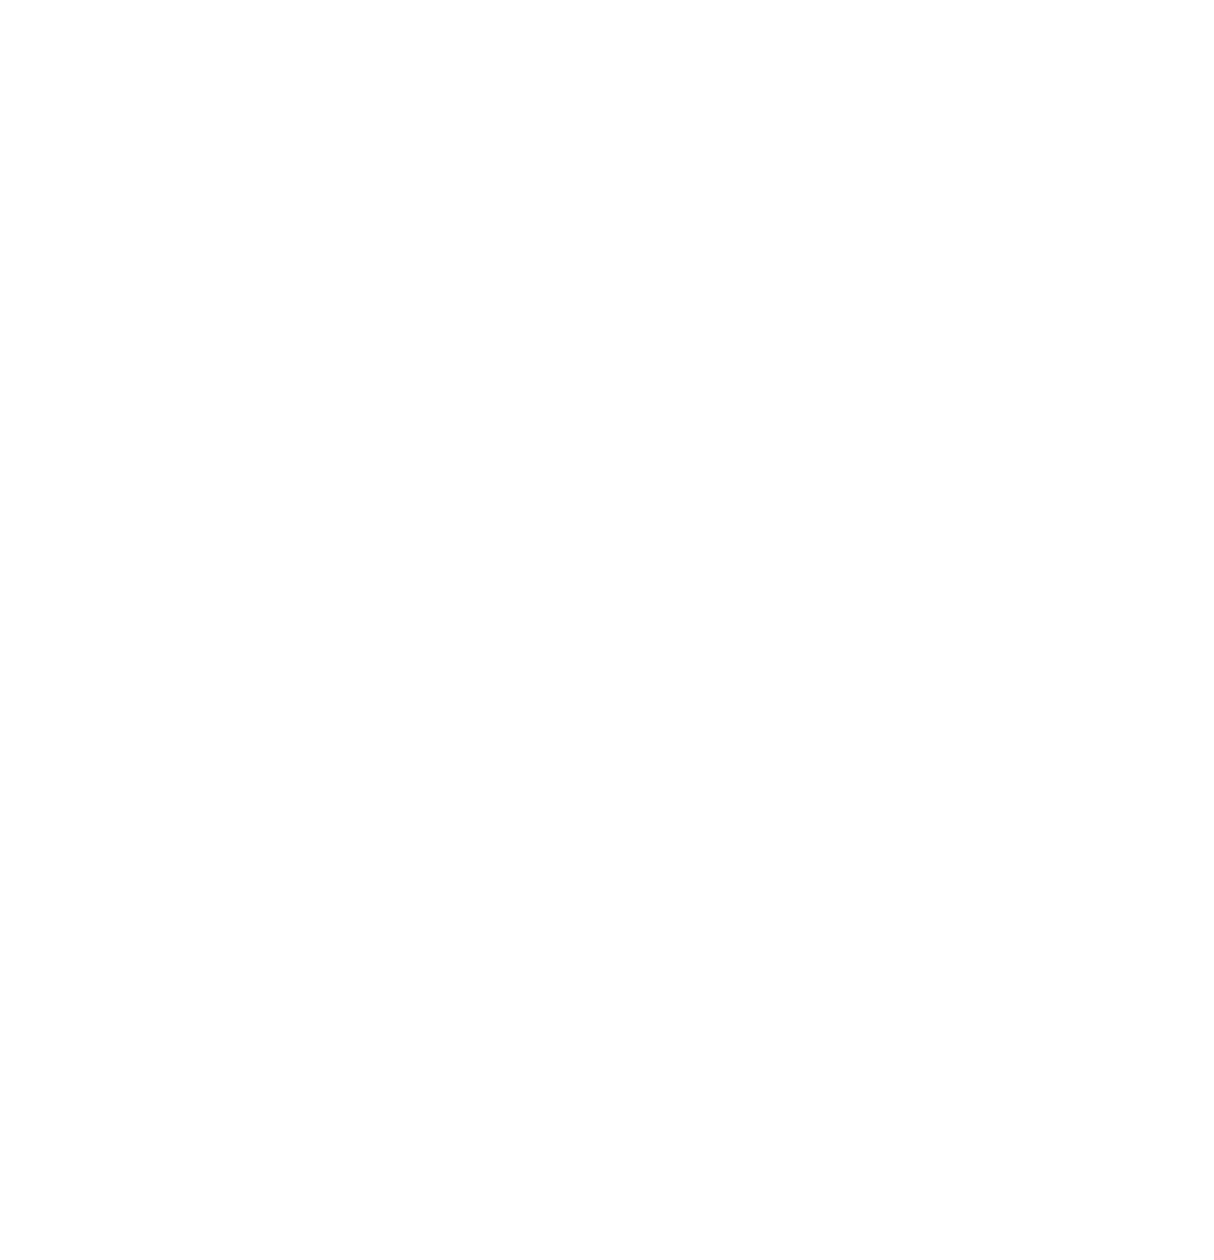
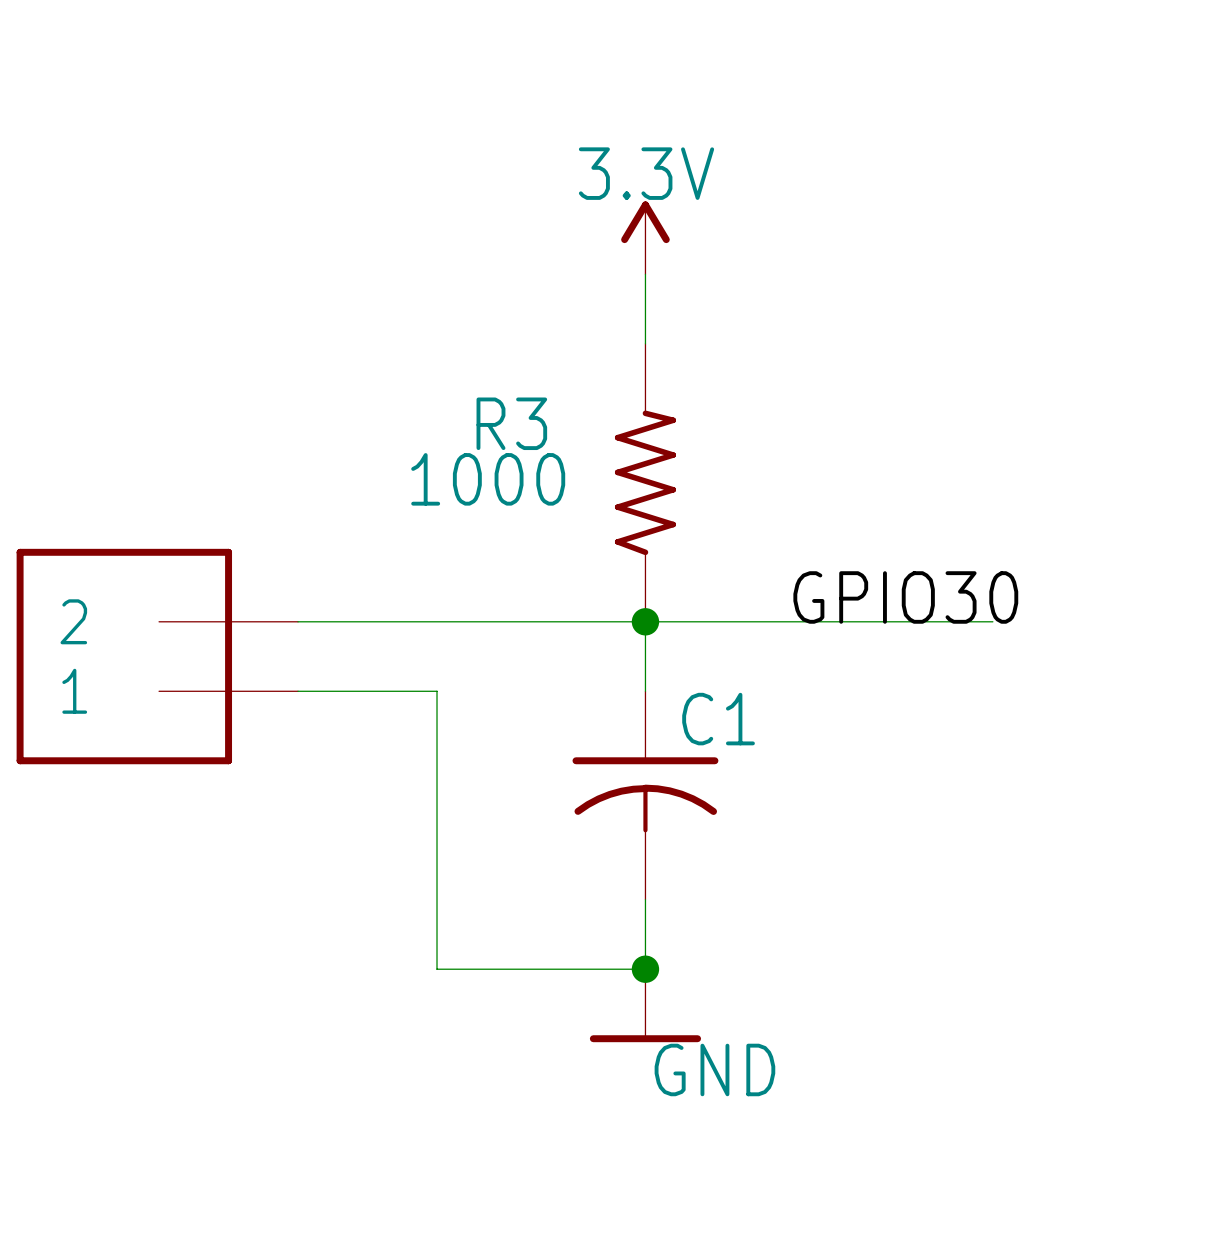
power symbol: none -> 3.3V (645, 237)
wire: none -> (645, 274) (645, 343)
R3: none -> 1000 (645, 482)
label: none -> GPIO30 (905, 597)
wire: none -> (298, 621) (992, 621)
wire: none -> (645, 621) (645, 691)
junction: none -> (645, 621)
part: none -> (157, 656)
wire: none -> (298, 691) (437, 691) (437, 969) (645, 969) (645, 899)
C1: none -> (645, 795)
junction: none -> (645, 969)
power symbol: none -> GND (645, 1005)

